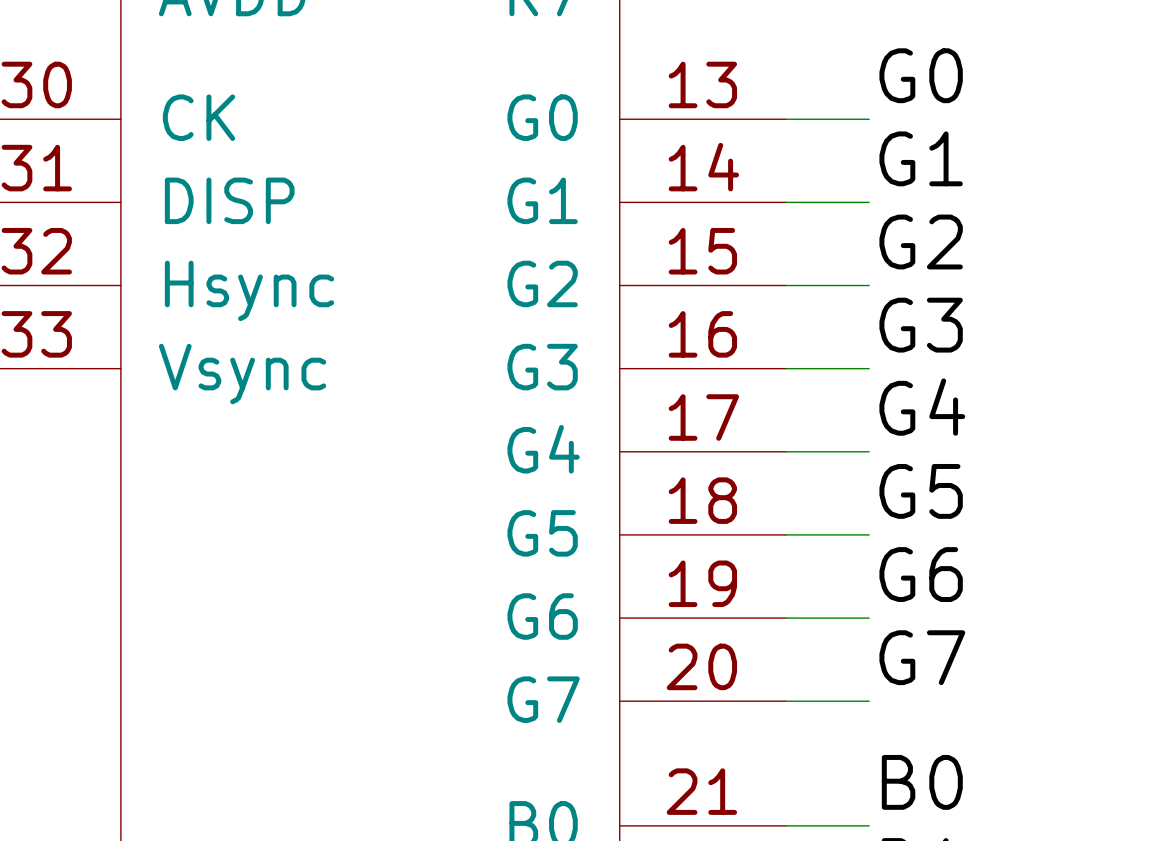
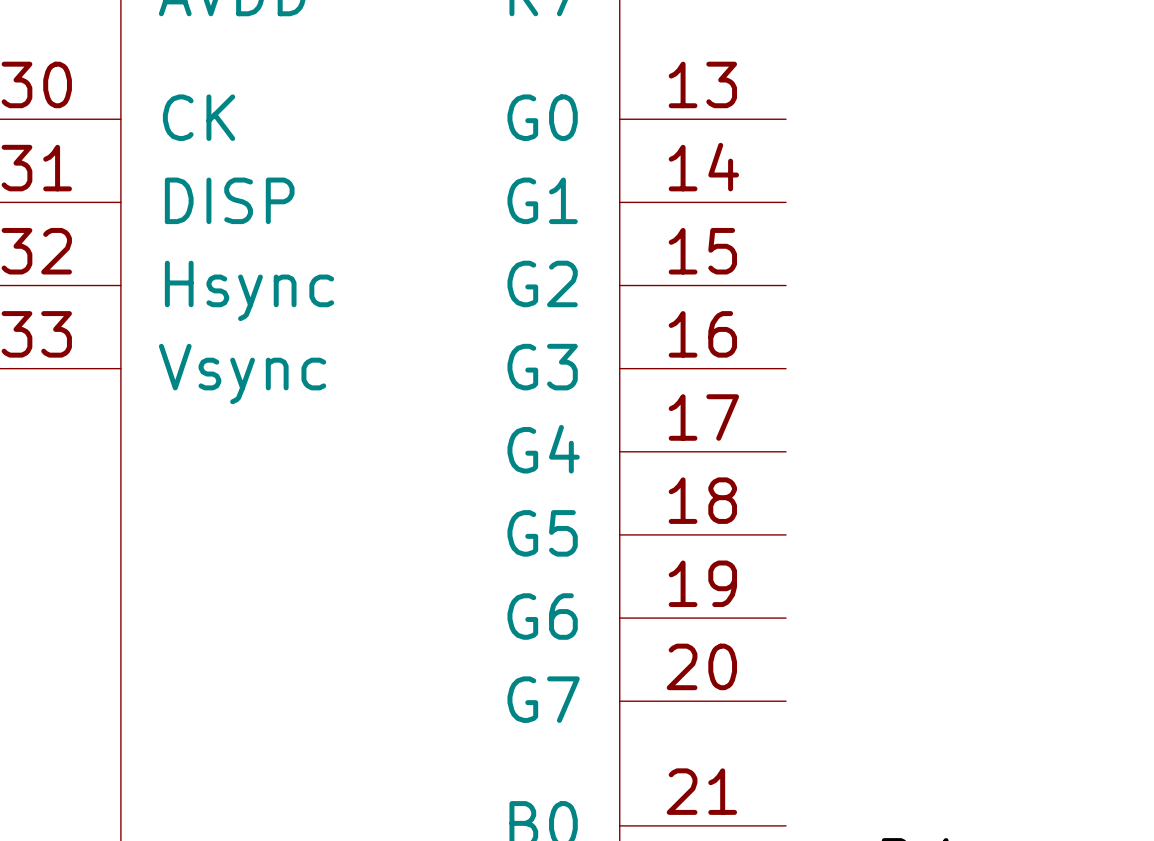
label: G0 (921, 75) -> none
wire: (786, 119) (869, 119) -> none
label: G1 (921, 158) -> none
wire: (786, 202) (869, 202) -> none
label: G2 (921, 242) -> none
wire: (786, 285) (869, 285) -> none
label: G3 (921, 325) -> none
wire: (786, 368) (869, 368) -> none
label: G4 (922, 407) -> none
wire: (786, 451) (869, 451) -> none
label: G5 (921, 491) -> none
wire: (786, 534) (869, 534) -> none
label: G6 (921, 574) -> none
wire: (786, 618) (869, 618) -> none
label: G7 (922, 657) -> none
wire: (786, 701) (869, 701) -> none
label: B0 (922, 782) -> none
wire: (786, 825) (869, 825) -> none

